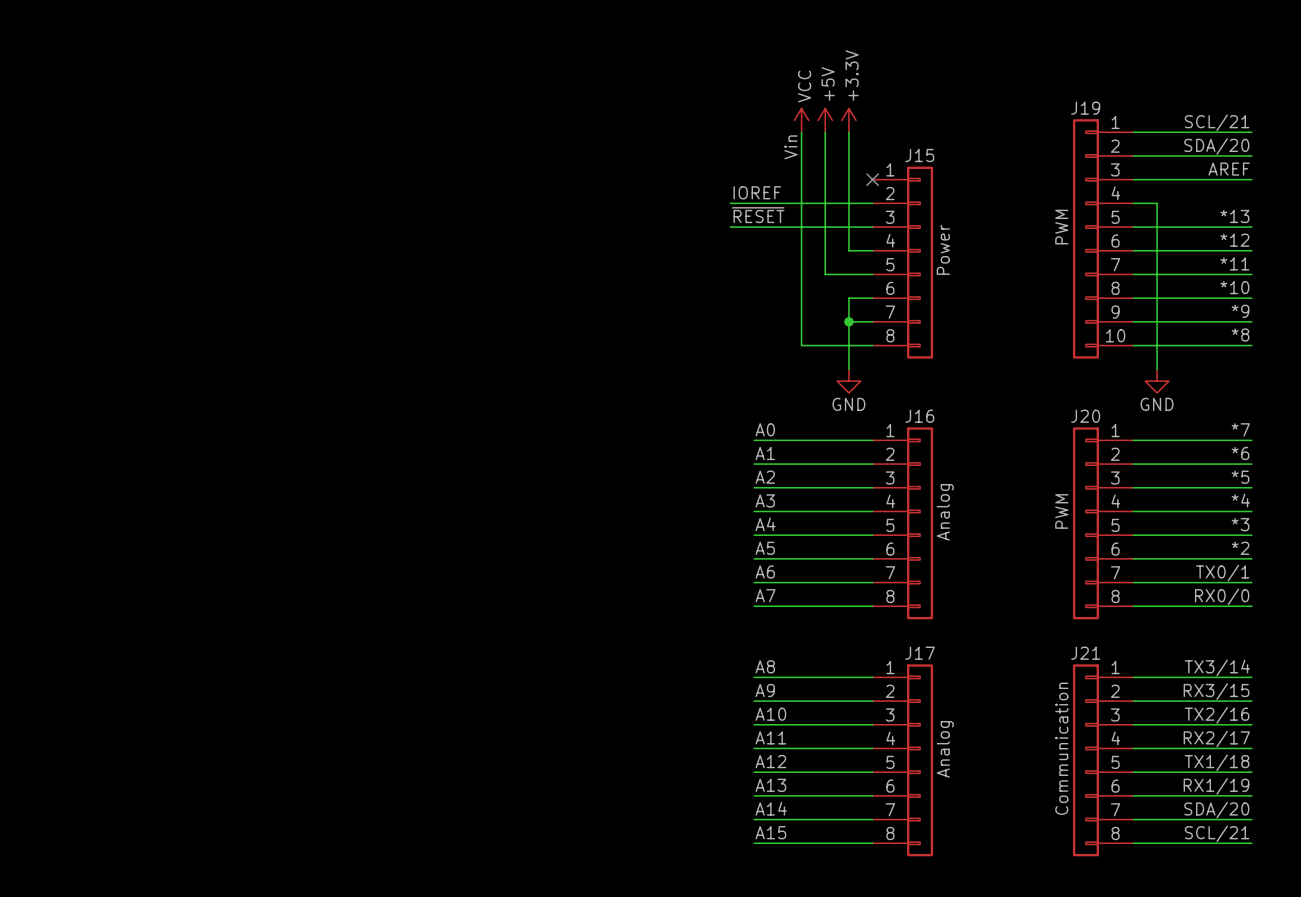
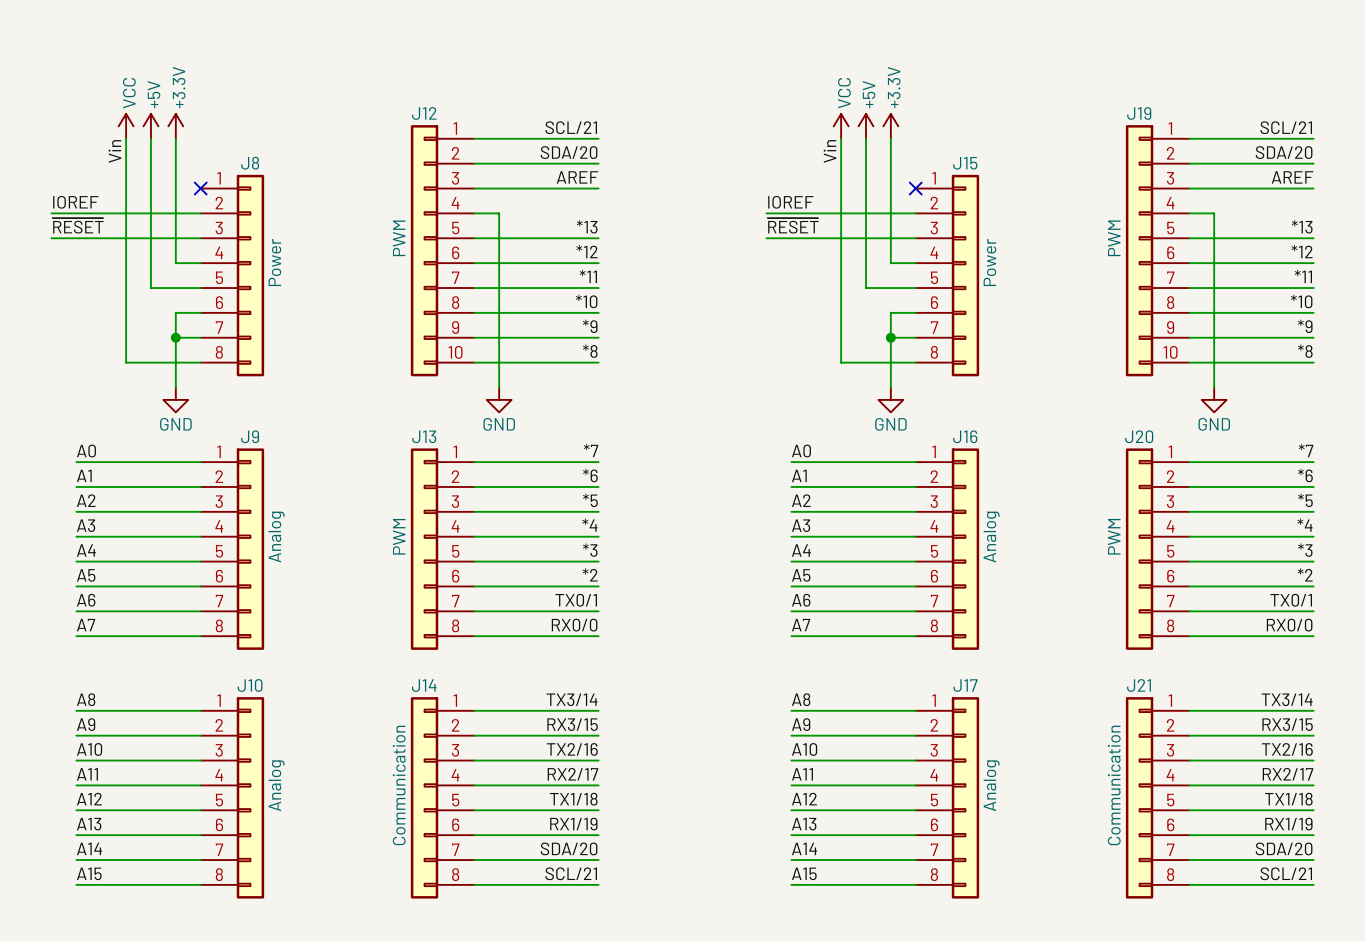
power symbol: none -> VCC (126, 126)
power symbol: none -> +5V (150, 126)
power symbol: none -> +3.3V (175, 126)
label: none -> SCL/21 (571, 127)
wire: none -> (126, 138) (126, 362) (200, 362)
wire: none -> (150, 138) (150, 288) (200, 288)
wire: none -> (175, 138) (175, 263) (200, 263)
wire: none -> (474, 138) (598, 138)
label: none -> SDA/20 (569, 152)
label: none -> Vin (114, 151)
wire: none -> (474, 163) (598, 163)
label: none -> AREF (577, 177)
no-connect mark: none -> (200, 188)
wire: none -> (474, 188) (598, 188)
label: none -> IOREF (75, 202)
wire: none -> (51, 213) (200, 213)
wire: none -> (474, 213) (499, 213) (499, 387)
label: none -> ~{RESET} (78, 225)
label: none -> *13 (587, 226)
wire: none -> (51, 238) (200, 238)
wire: none -> (474, 238) (598, 238)
J12: none -> PWM (442, 250)
label: none -> *12 (587, 251)
wire: none -> (474, 263) (598, 263)
J8: none -> Power (232, 275)
label: none -> *11 (588, 276)
wire: none -> (474, 288) (598, 288)
label: none -> *10 (586, 301)
wire: none -> (200, 312) (175, 312) (175, 387)
wire: none -> (474, 312) (598, 312)
label: none -> *9 (590, 326)
wire: none -> (175, 337) (200, 337)
junction: none -> (175, 337)
wire: none -> (474, 337) (598, 337)
label: none -> *8 (590, 351)
wire: none -> (474, 362) (598, 362)
power symbol: none -> GND (175, 399)
power symbol: none -> GND (499, 399)
label: none -> A0 (86, 451)
label: none -> *7 (590, 450)
wire: none -> (76, 462) (200, 462)
wire: none -> (474, 462) (598, 462)
label: none -> A1 (84, 475)
label: none -> *6 (590, 475)
wire: none -> (76, 486) (200, 486)
wire: none -> (474, 486) (598, 486)
label: none -> A2 (86, 500)
label: none -> *5 (590, 500)
wire: none -> (76, 511) (200, 511)
wire: none -> (474, 511) (598, 511)
label: none -> A3 (86, 525)
label: none -> *4 (589, 525)
wire: none -> (76, 536) (200, 536)
wire: none -> (474, 536) (598, 536)
J9: none -> Analog (232, 549)
J13: none -> PWM (442, 549)
label: none -> A4 (86, 550)
label: none -> *3 (590, 550)
wire: none -> (76, 561) (200, 561)
wire: none -> (474, 561) (598, 561)
label: none -> A5 (86, 575)
label: none -> *2 (590, 574)
wire: none -> (76, 586) (200, 586)
wire: none -> (474, 586) (598, 586)
label: none -> A6 (86, 600)
label: none -> TX0/1 (576, 600)
wire: none -> (76, 611) (200, 611)
wire: none -> (474, 611) (598, 611)
label: none -> A7 (86, 625)
label: none -> RX0/0 (574, 625)
wire: none -> (76, 636) (200, 636)
wire: none -> (474, 636) (598, 636)
label: none -> A8 (86, 699)
label: none -> TX3/14 (572, 699)
wire: none -> (76, 710) (200, 710)
wire: none -> (474, 710) (598, 710)
label: none -> A9 (86, 724)
label: none -> RX3/15 (572, 724)
wire: none -> (76, 735) (200, 735)
wire: none -> (474, 735) (598, 735)
label: none -> A10 (89, 749)
label: none -> TX2/16 (572, 749)
wire: none -> (76, 760) (200, 760)
wire: none -> (474, 760) (598, 760)
label: none -> A11 (87, 774)
label: none -> RX2/17 (572, 774)
wire: none -> (76, 785) (200, 785)
wire: none -> (474, 785) (598, 785)
J10: none -> Analog (232, 797)
J14: none -> Communication (442, 797)
label: none -> A12 (89, 799)
label: none -> TX1/18 (573, 799)
wire: none -> (76, 810) (200, 810)
wire: none -> (474, 810) (598, 810)
label: none -> A13 (89, 824)
label: none -> RX1/19 (573, 824)
wire: none -> (76, 835) (200, 835)
wire: none -> (474, 835) (598, 835)
label: none -> A14 (89, 848)
label: none -> SDA/20 (569, 848)
wire: none -> (76, 860) (200, 860)
wire: none -> (474, 860) (598, 860)
label: none -> A15 (89, 873)
label: none -> SCL/21 (571, 873)
wire: none -> (76, 884) (200, 884)
wire: none -> (474, 884) (598, 884)

